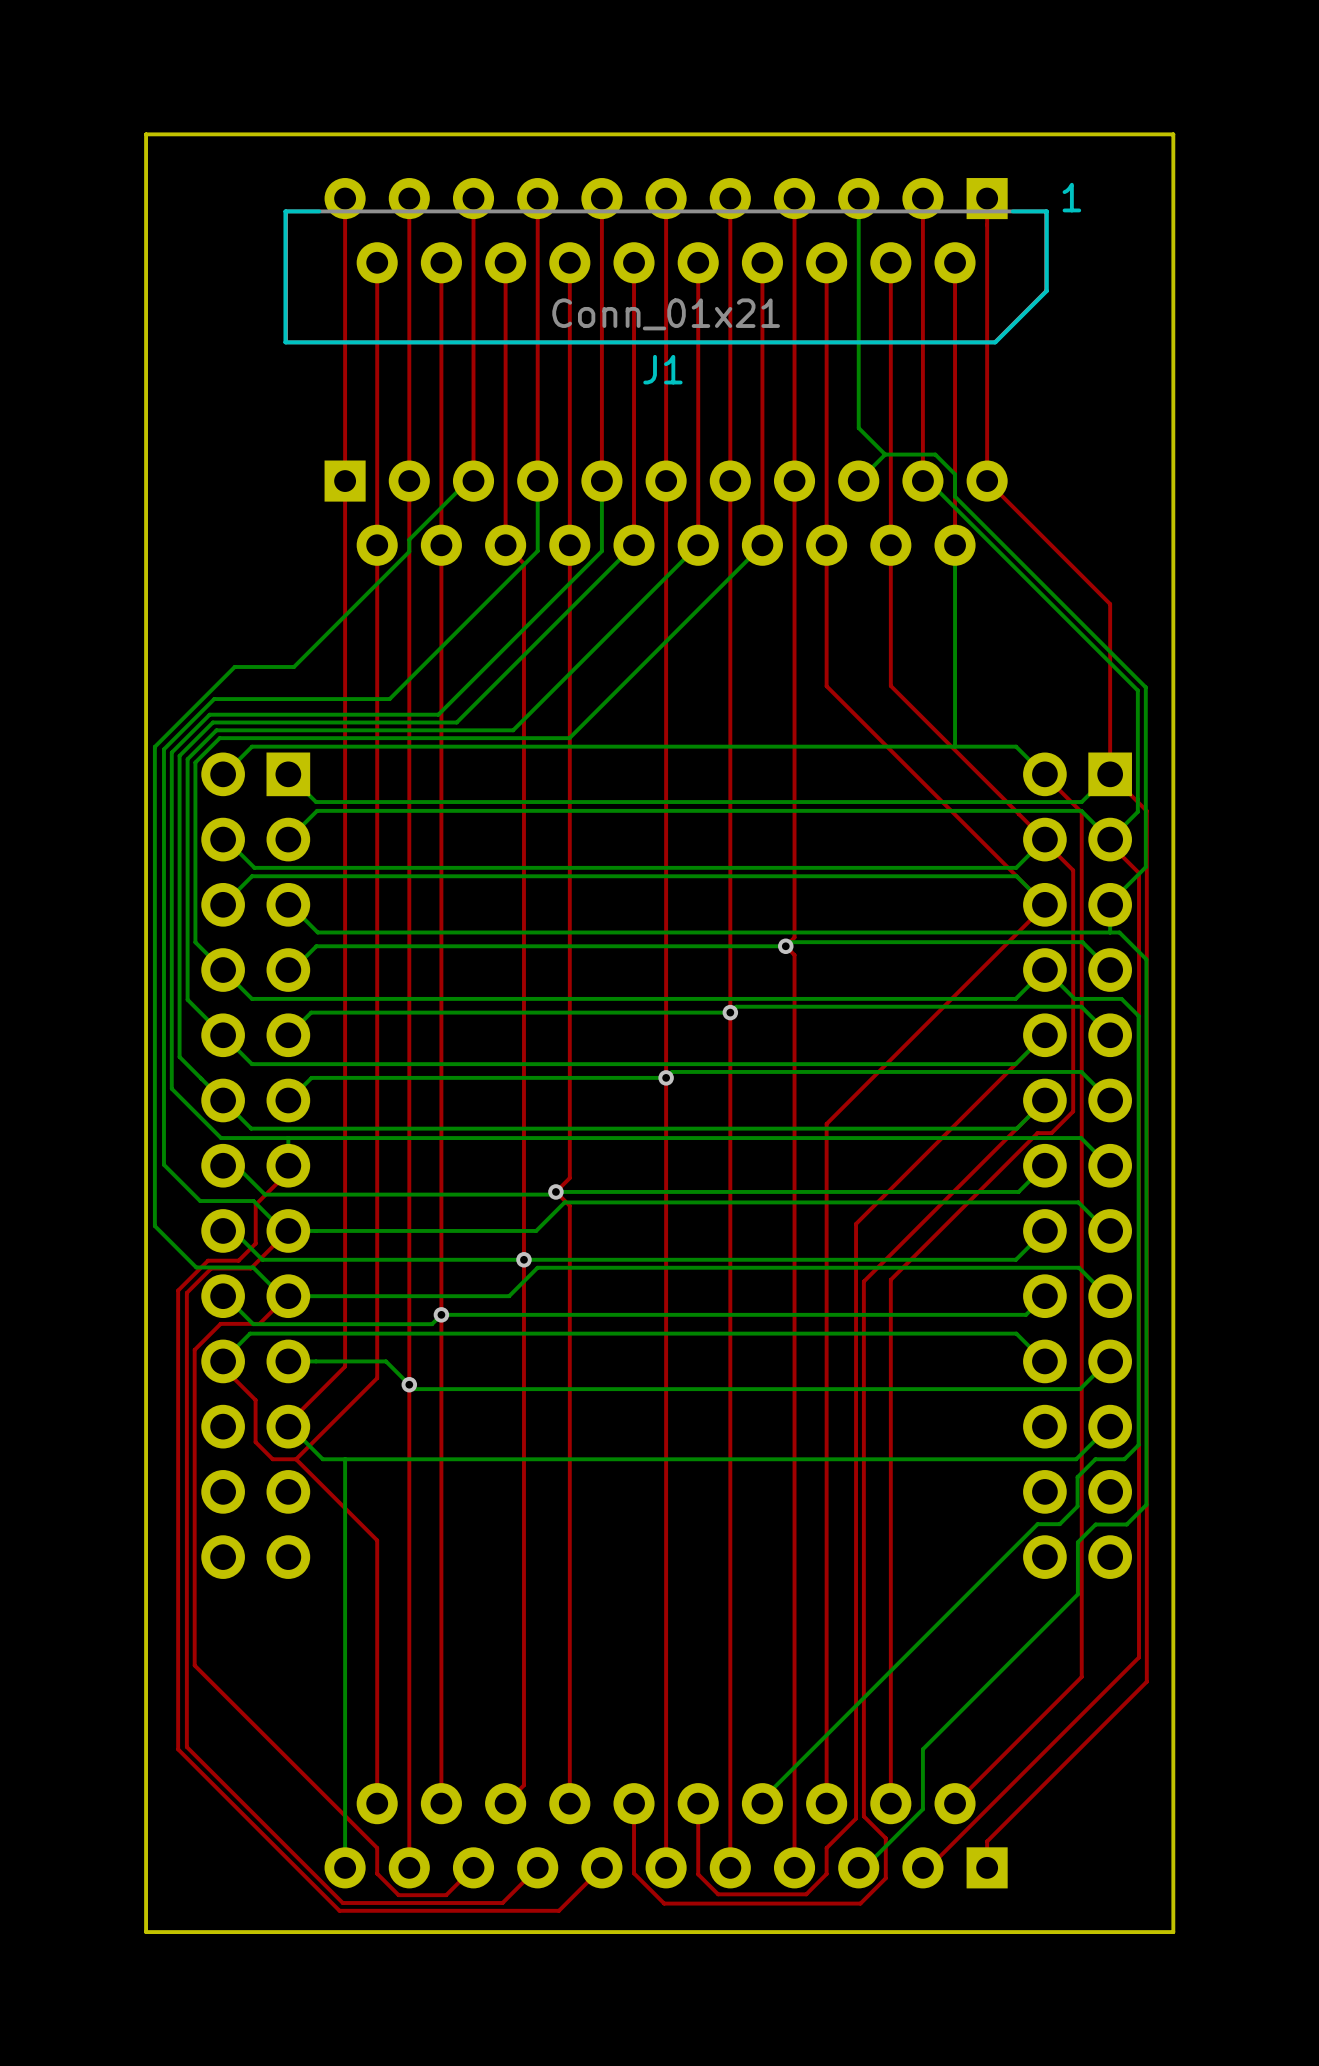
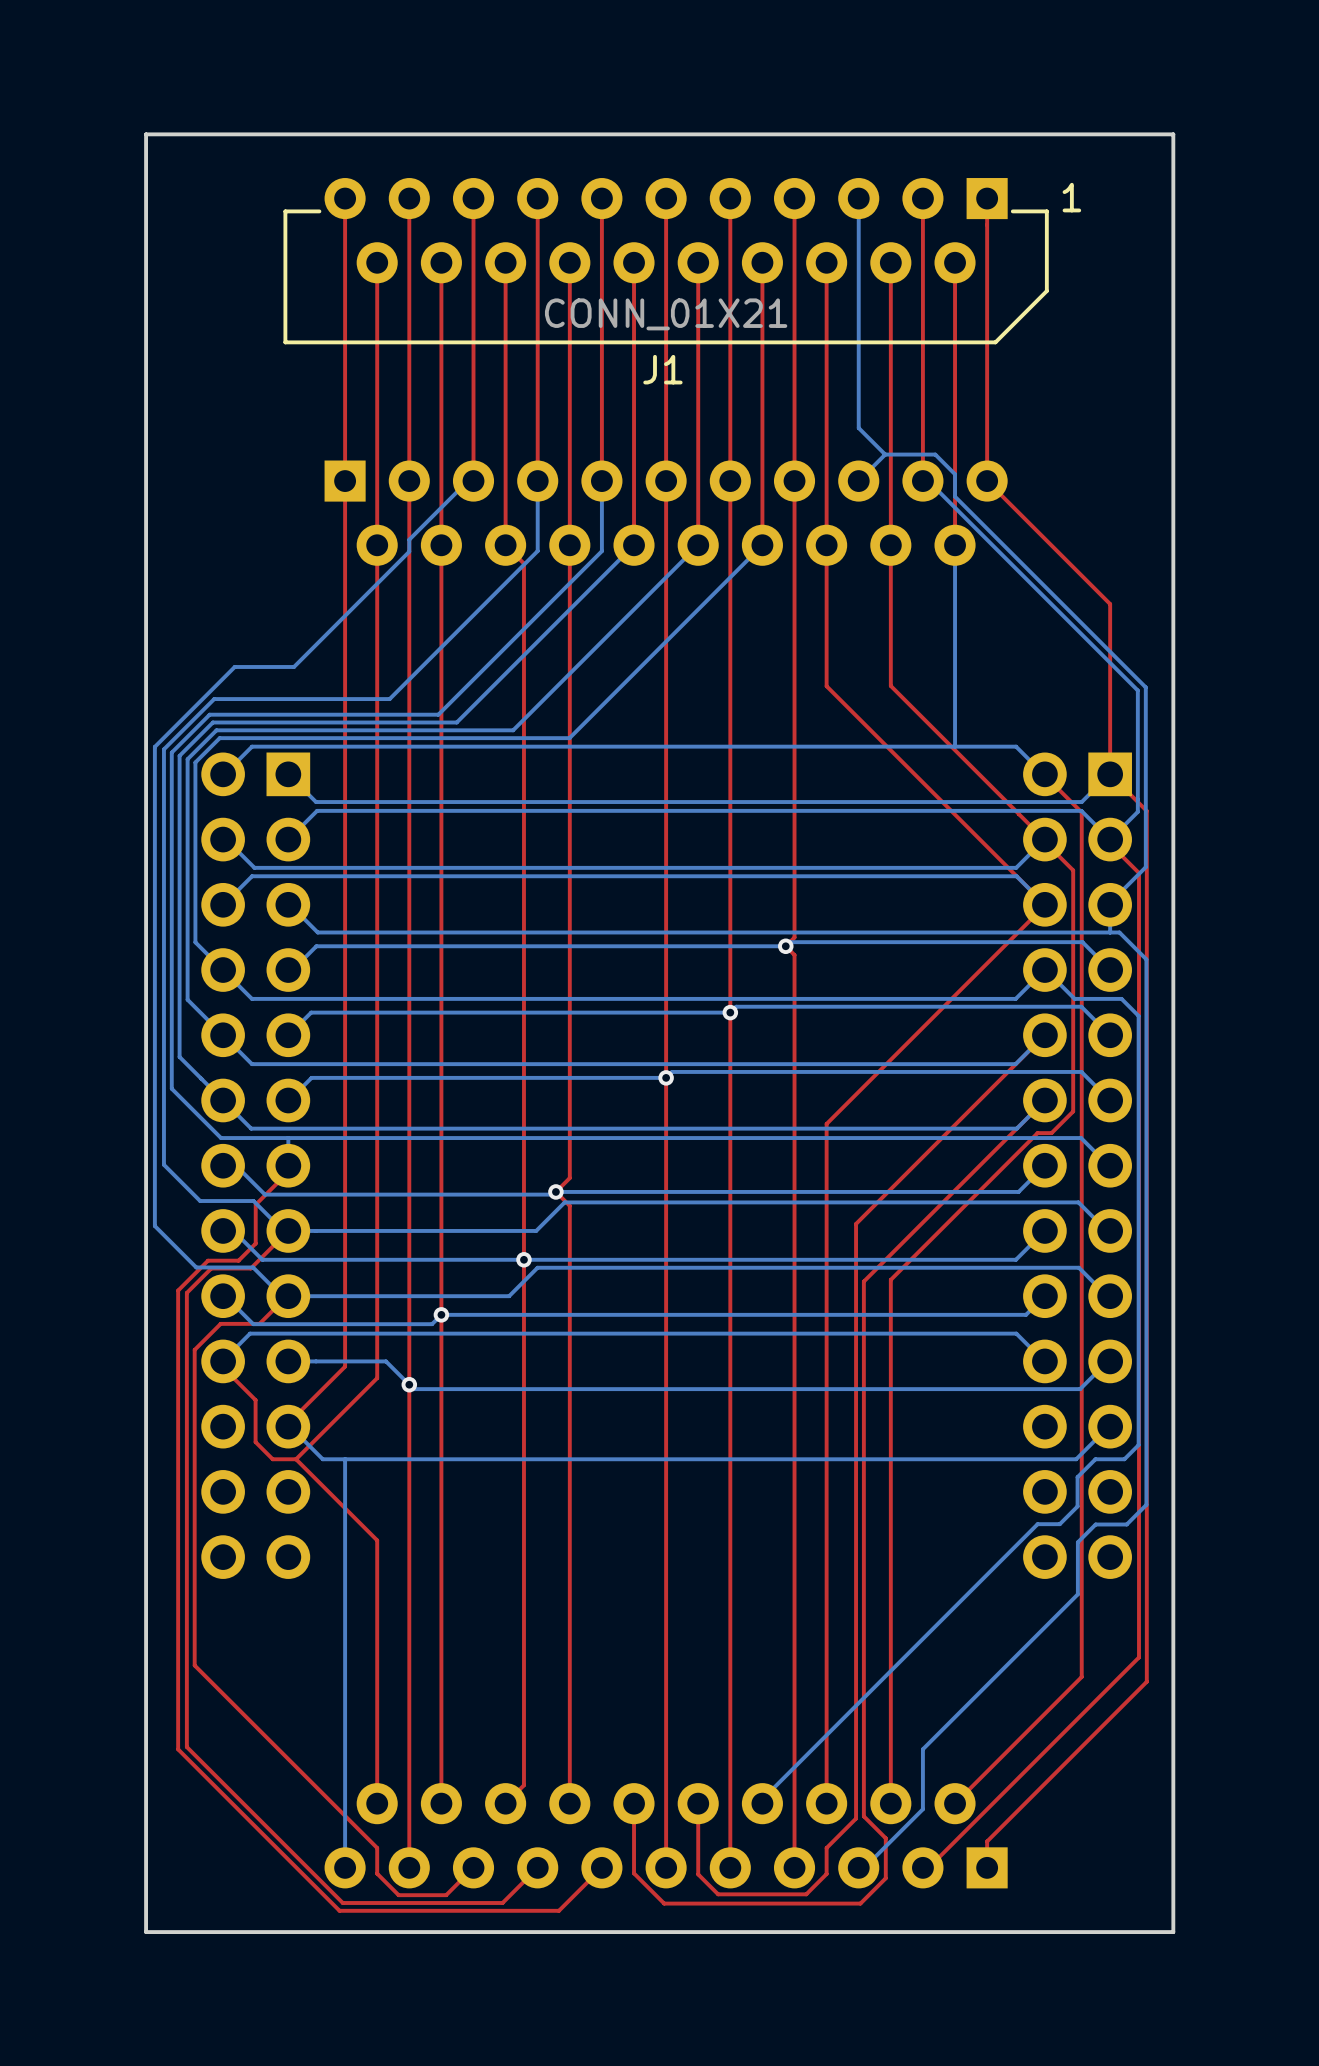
J1 footprint: [283, 178, 1049, 345] -> [283, 178, 1049, 345]
J1 value: Conn_01x21 (666, 314) -> CONN_01X21 (666, 314)

